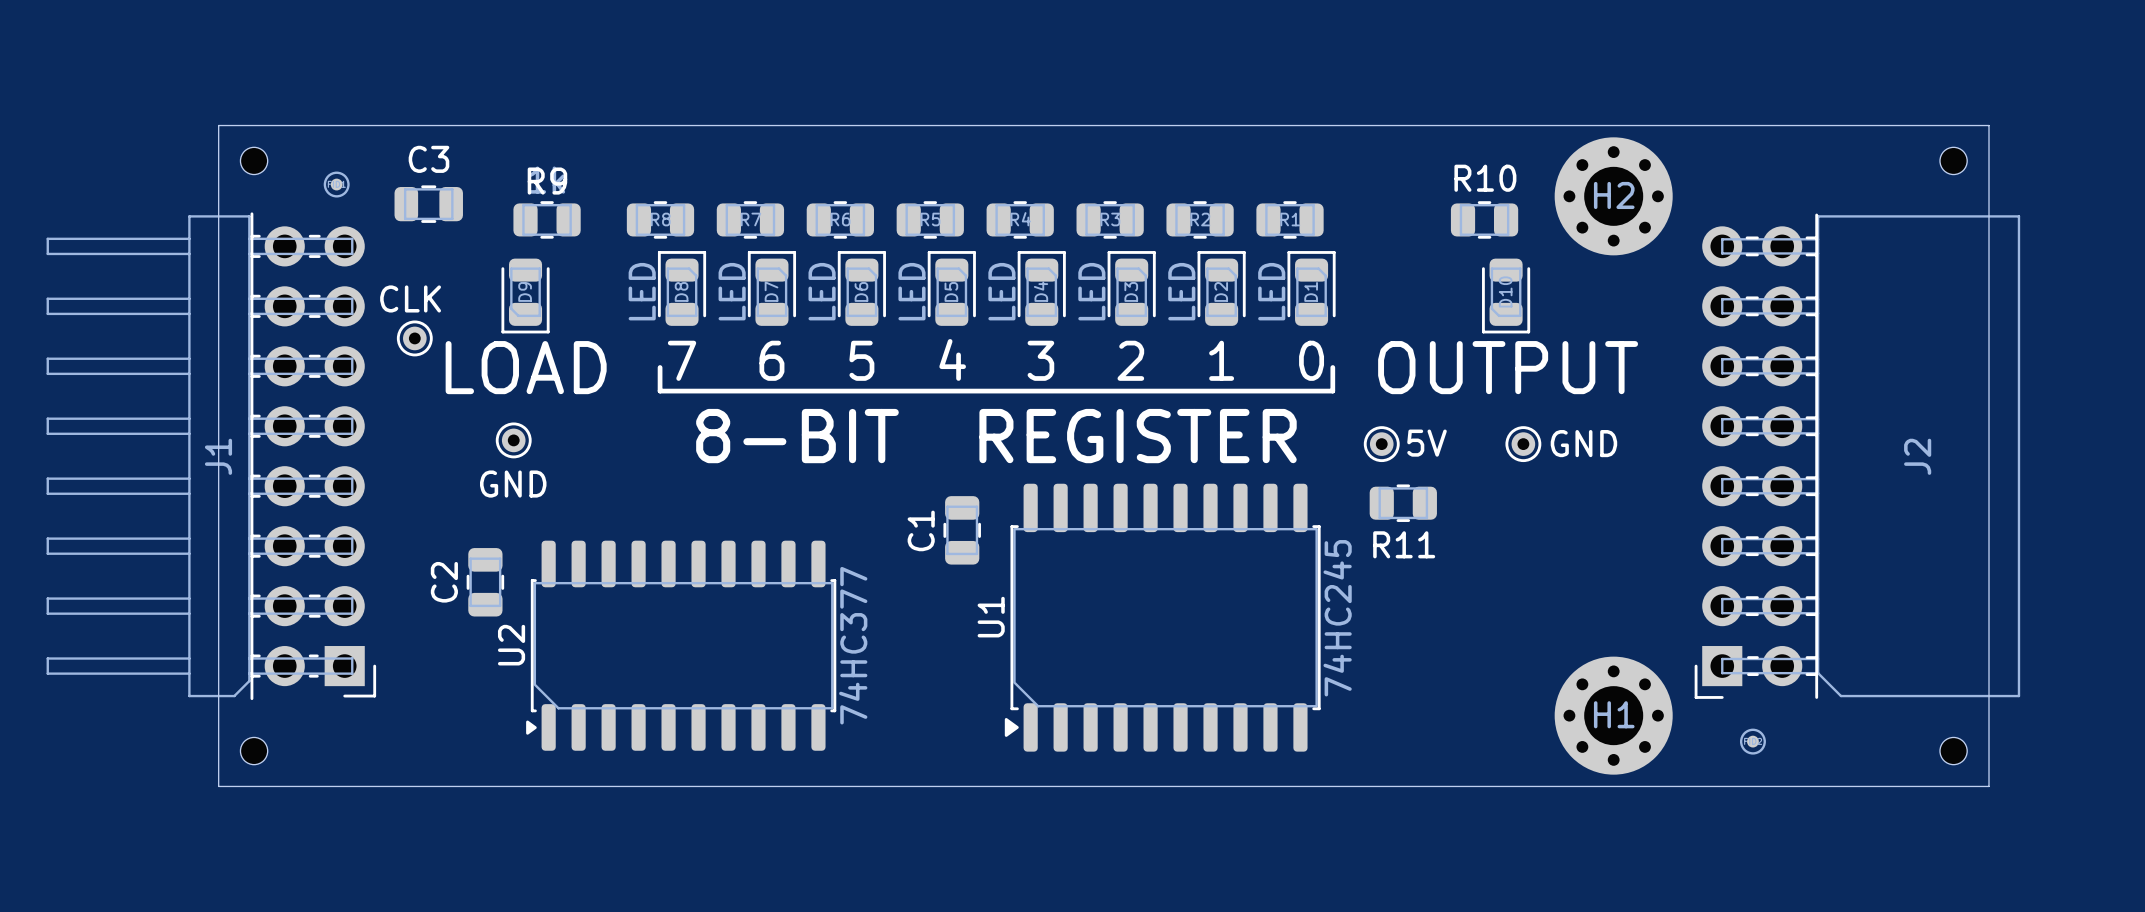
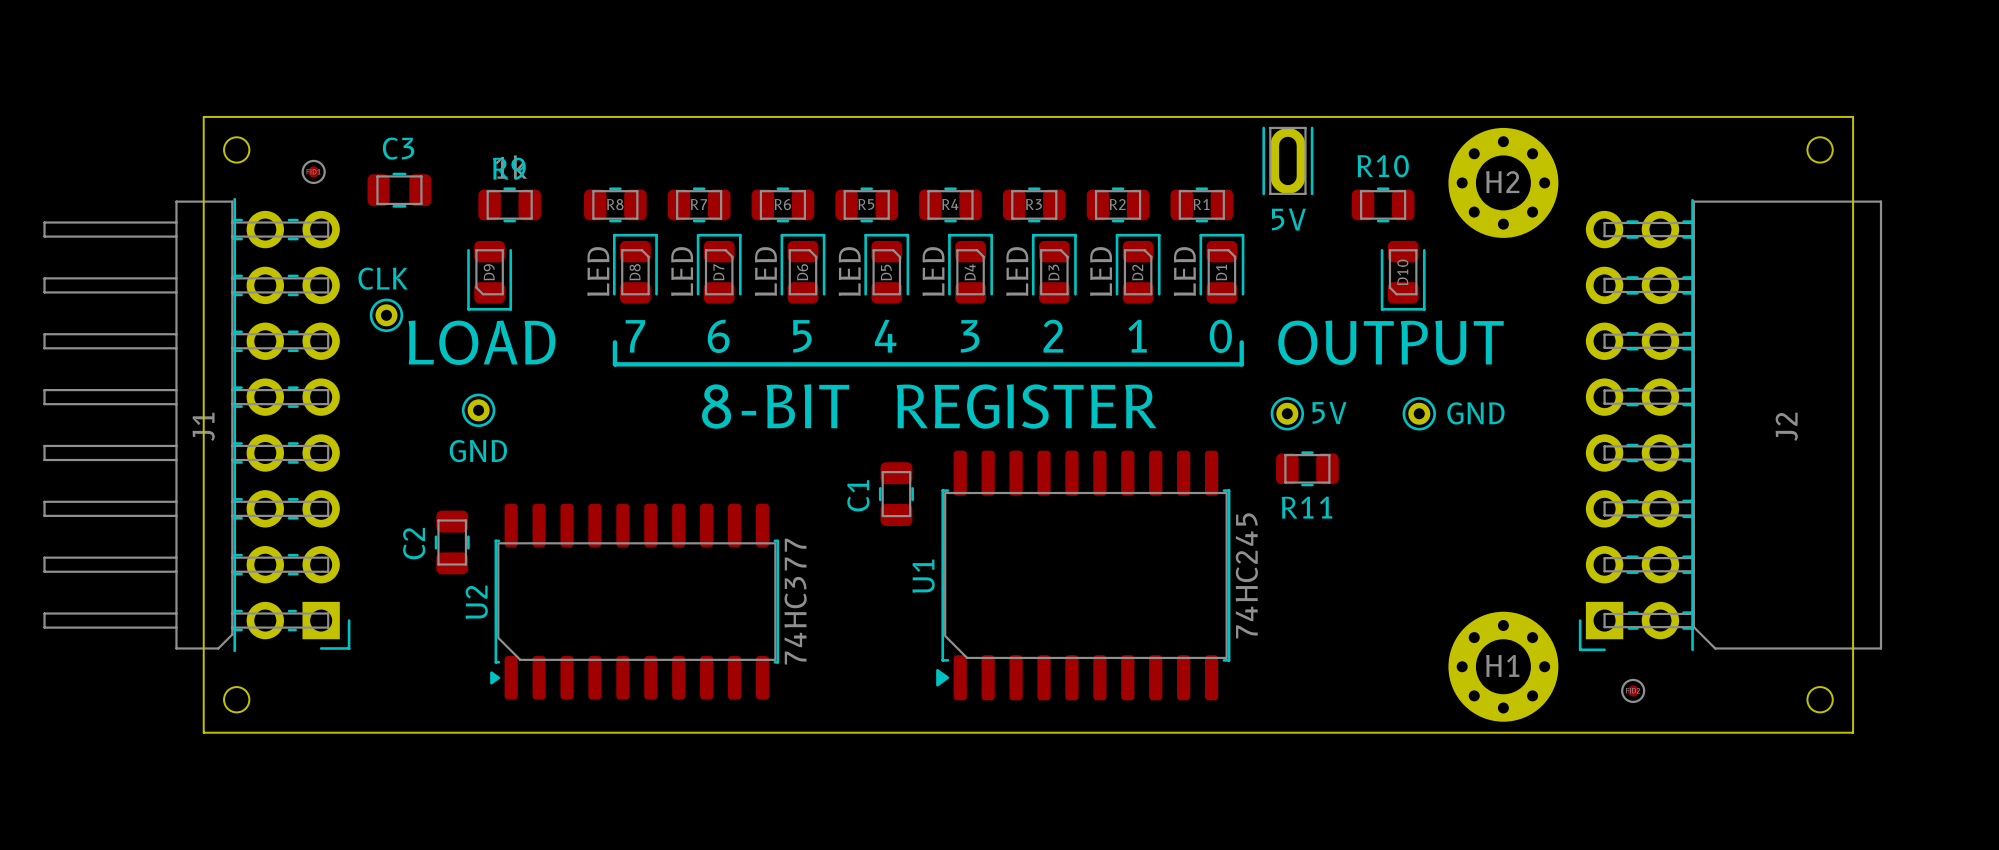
part: none -> (1287, 160)
text: none -> 5V (1288, 219)

